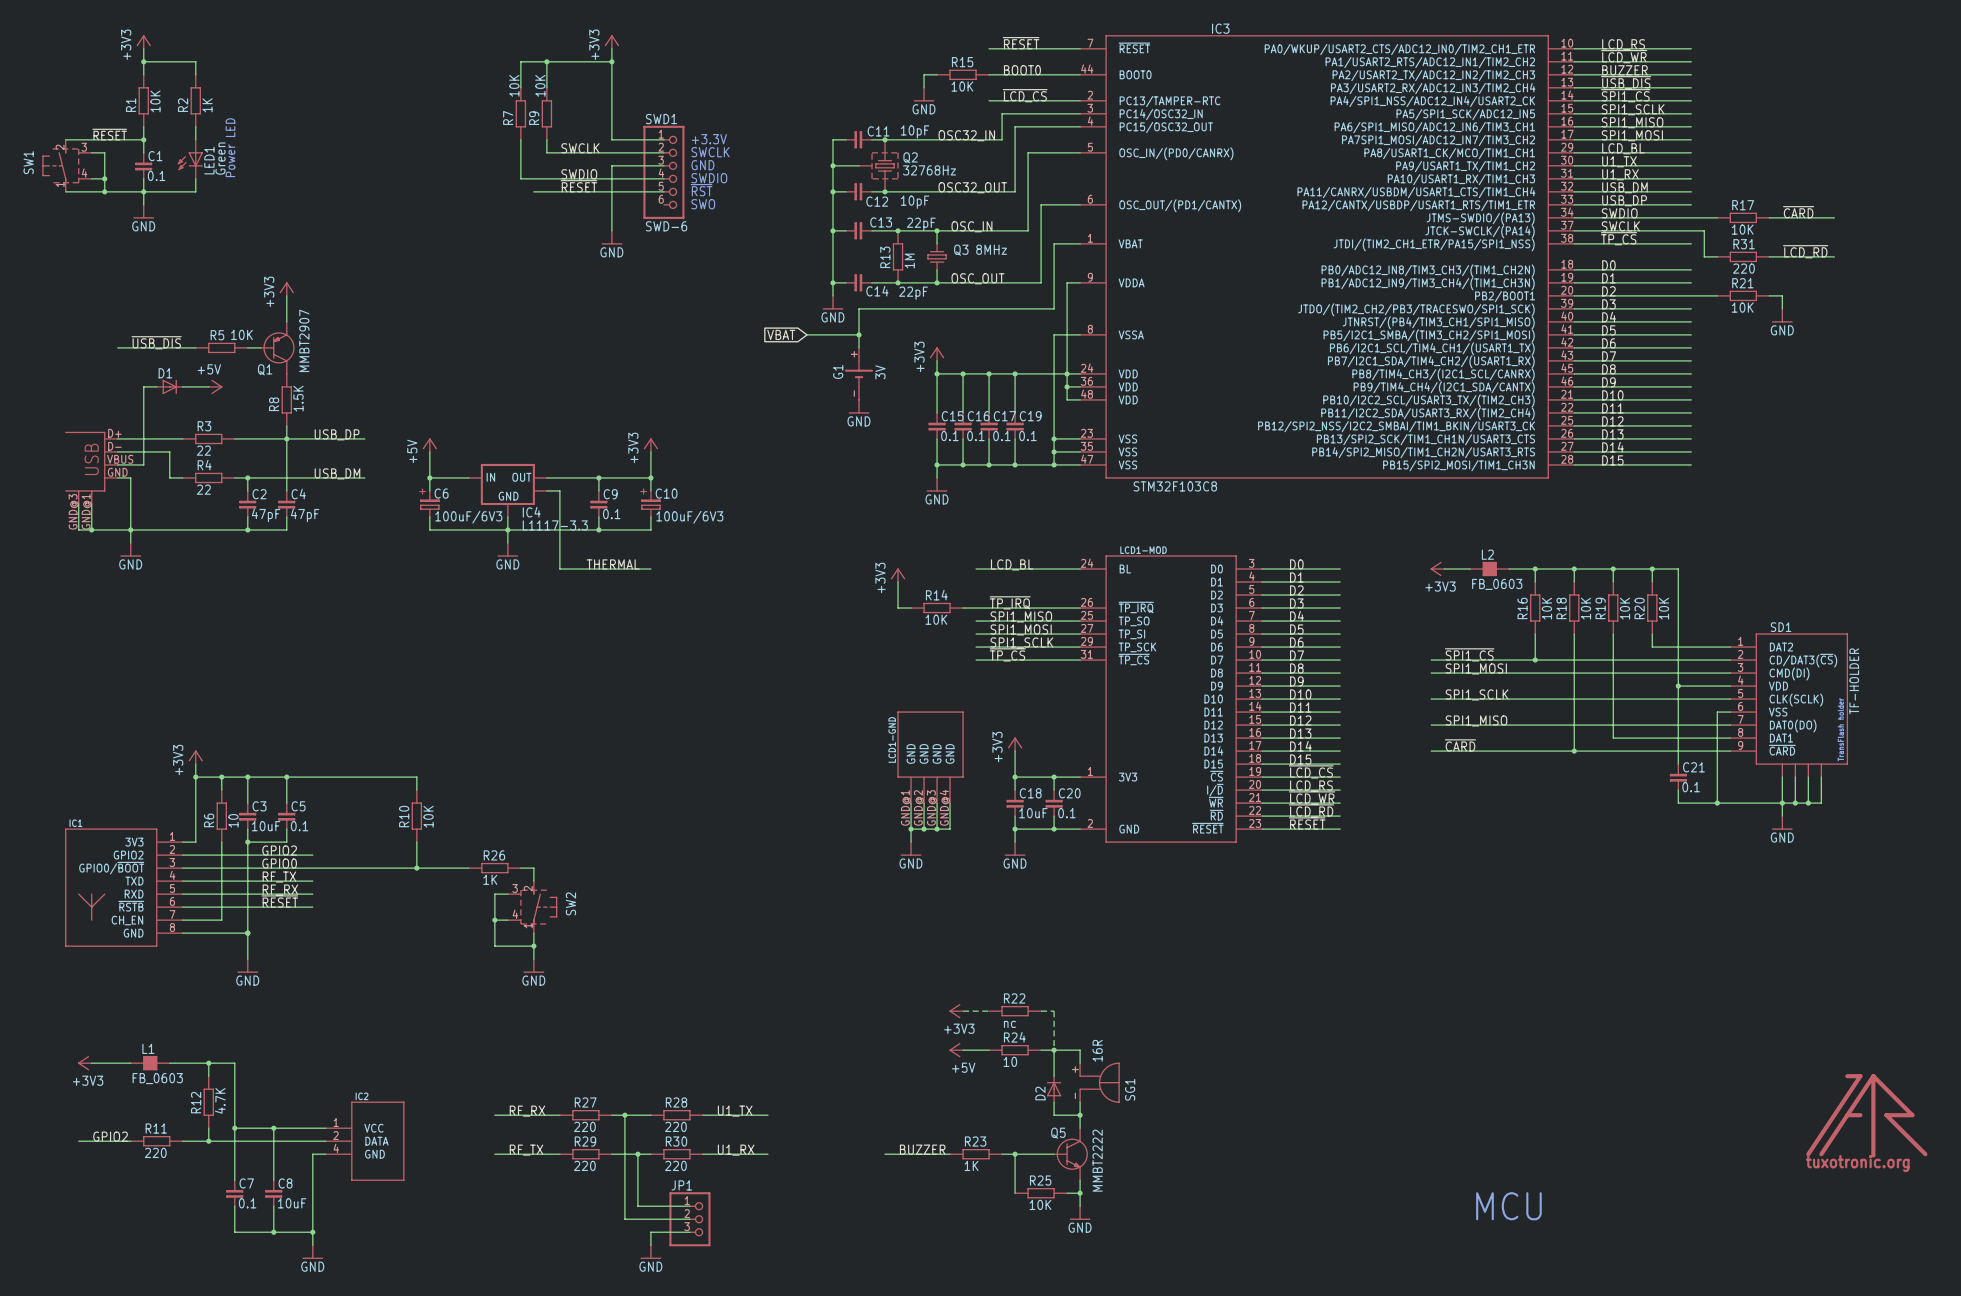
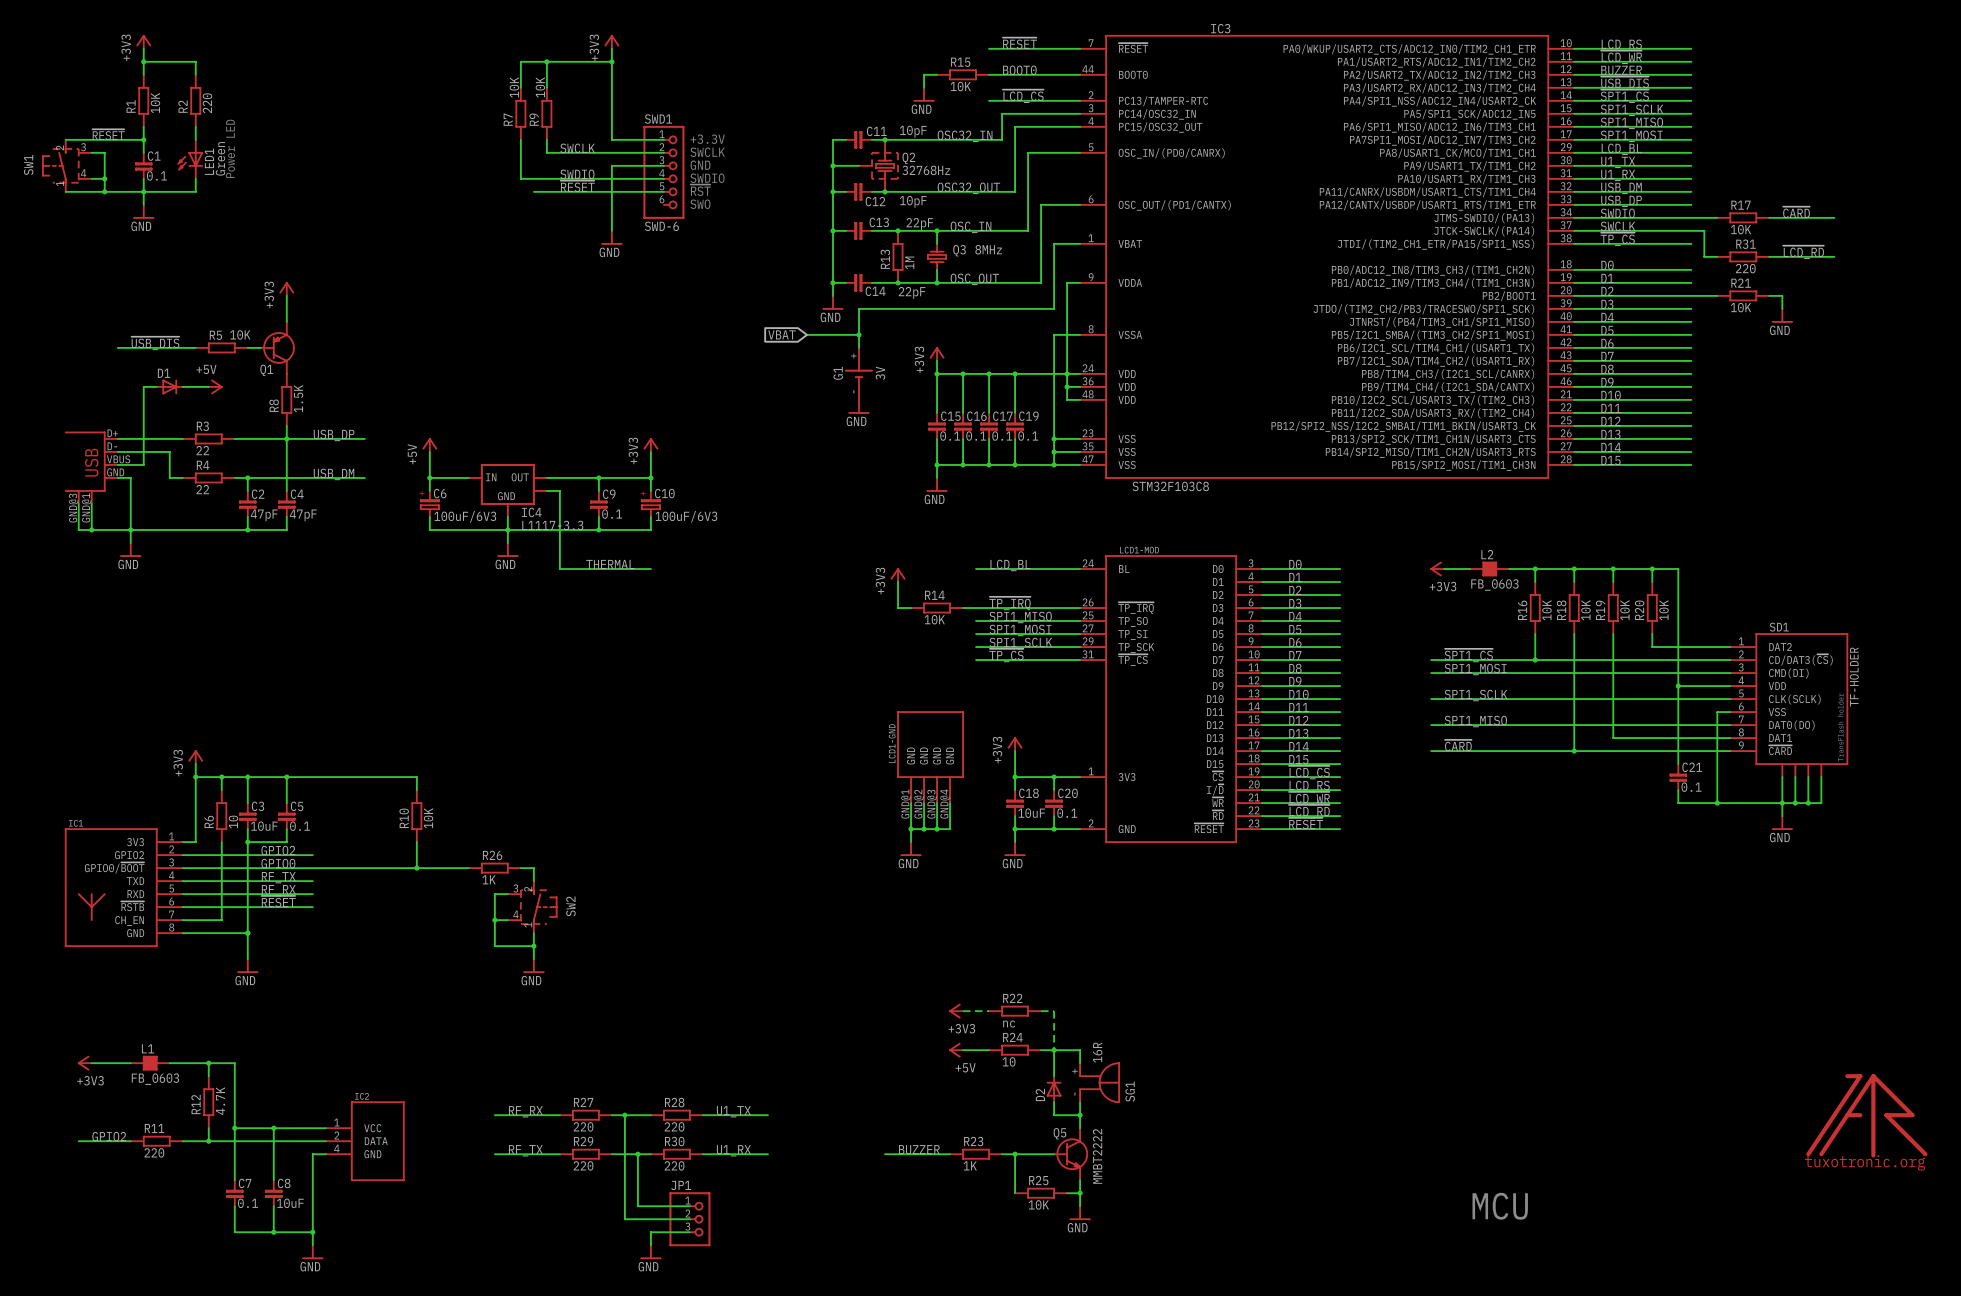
R2 value: 1K (207, 105) -> 220 (207, 103)
Q1 value: MMBT2907 (304, 340) -> none

